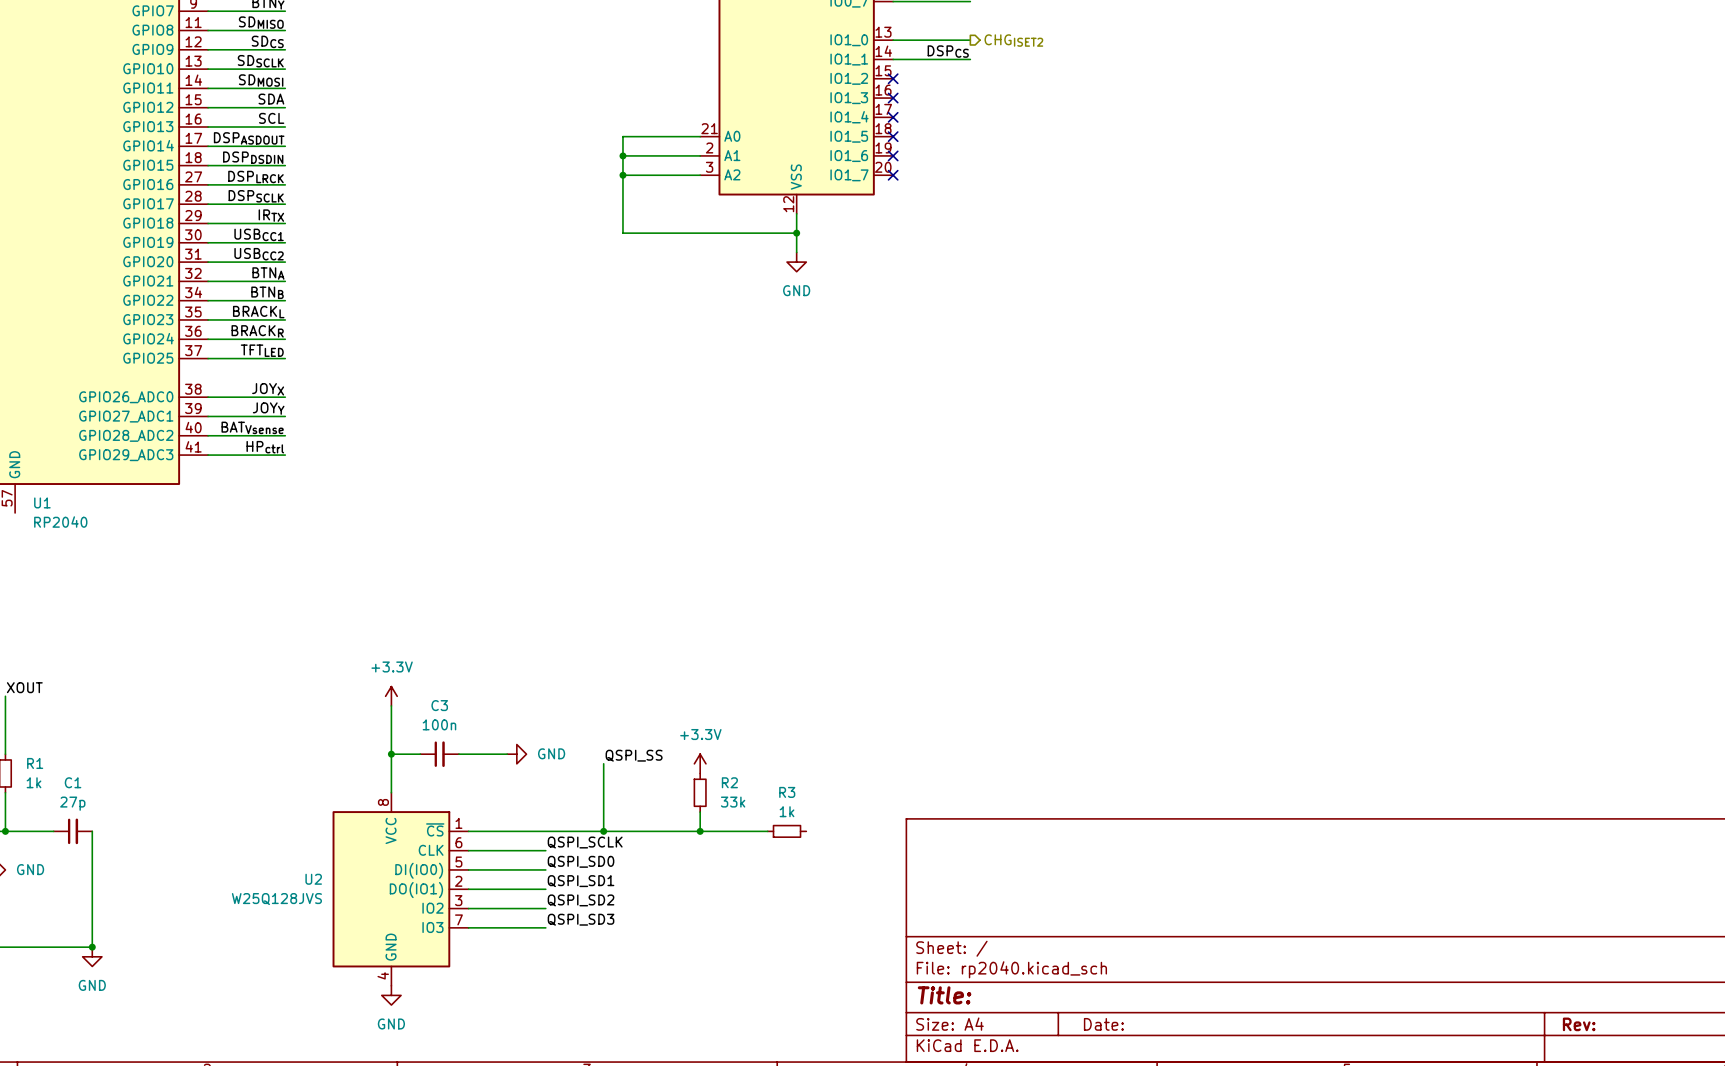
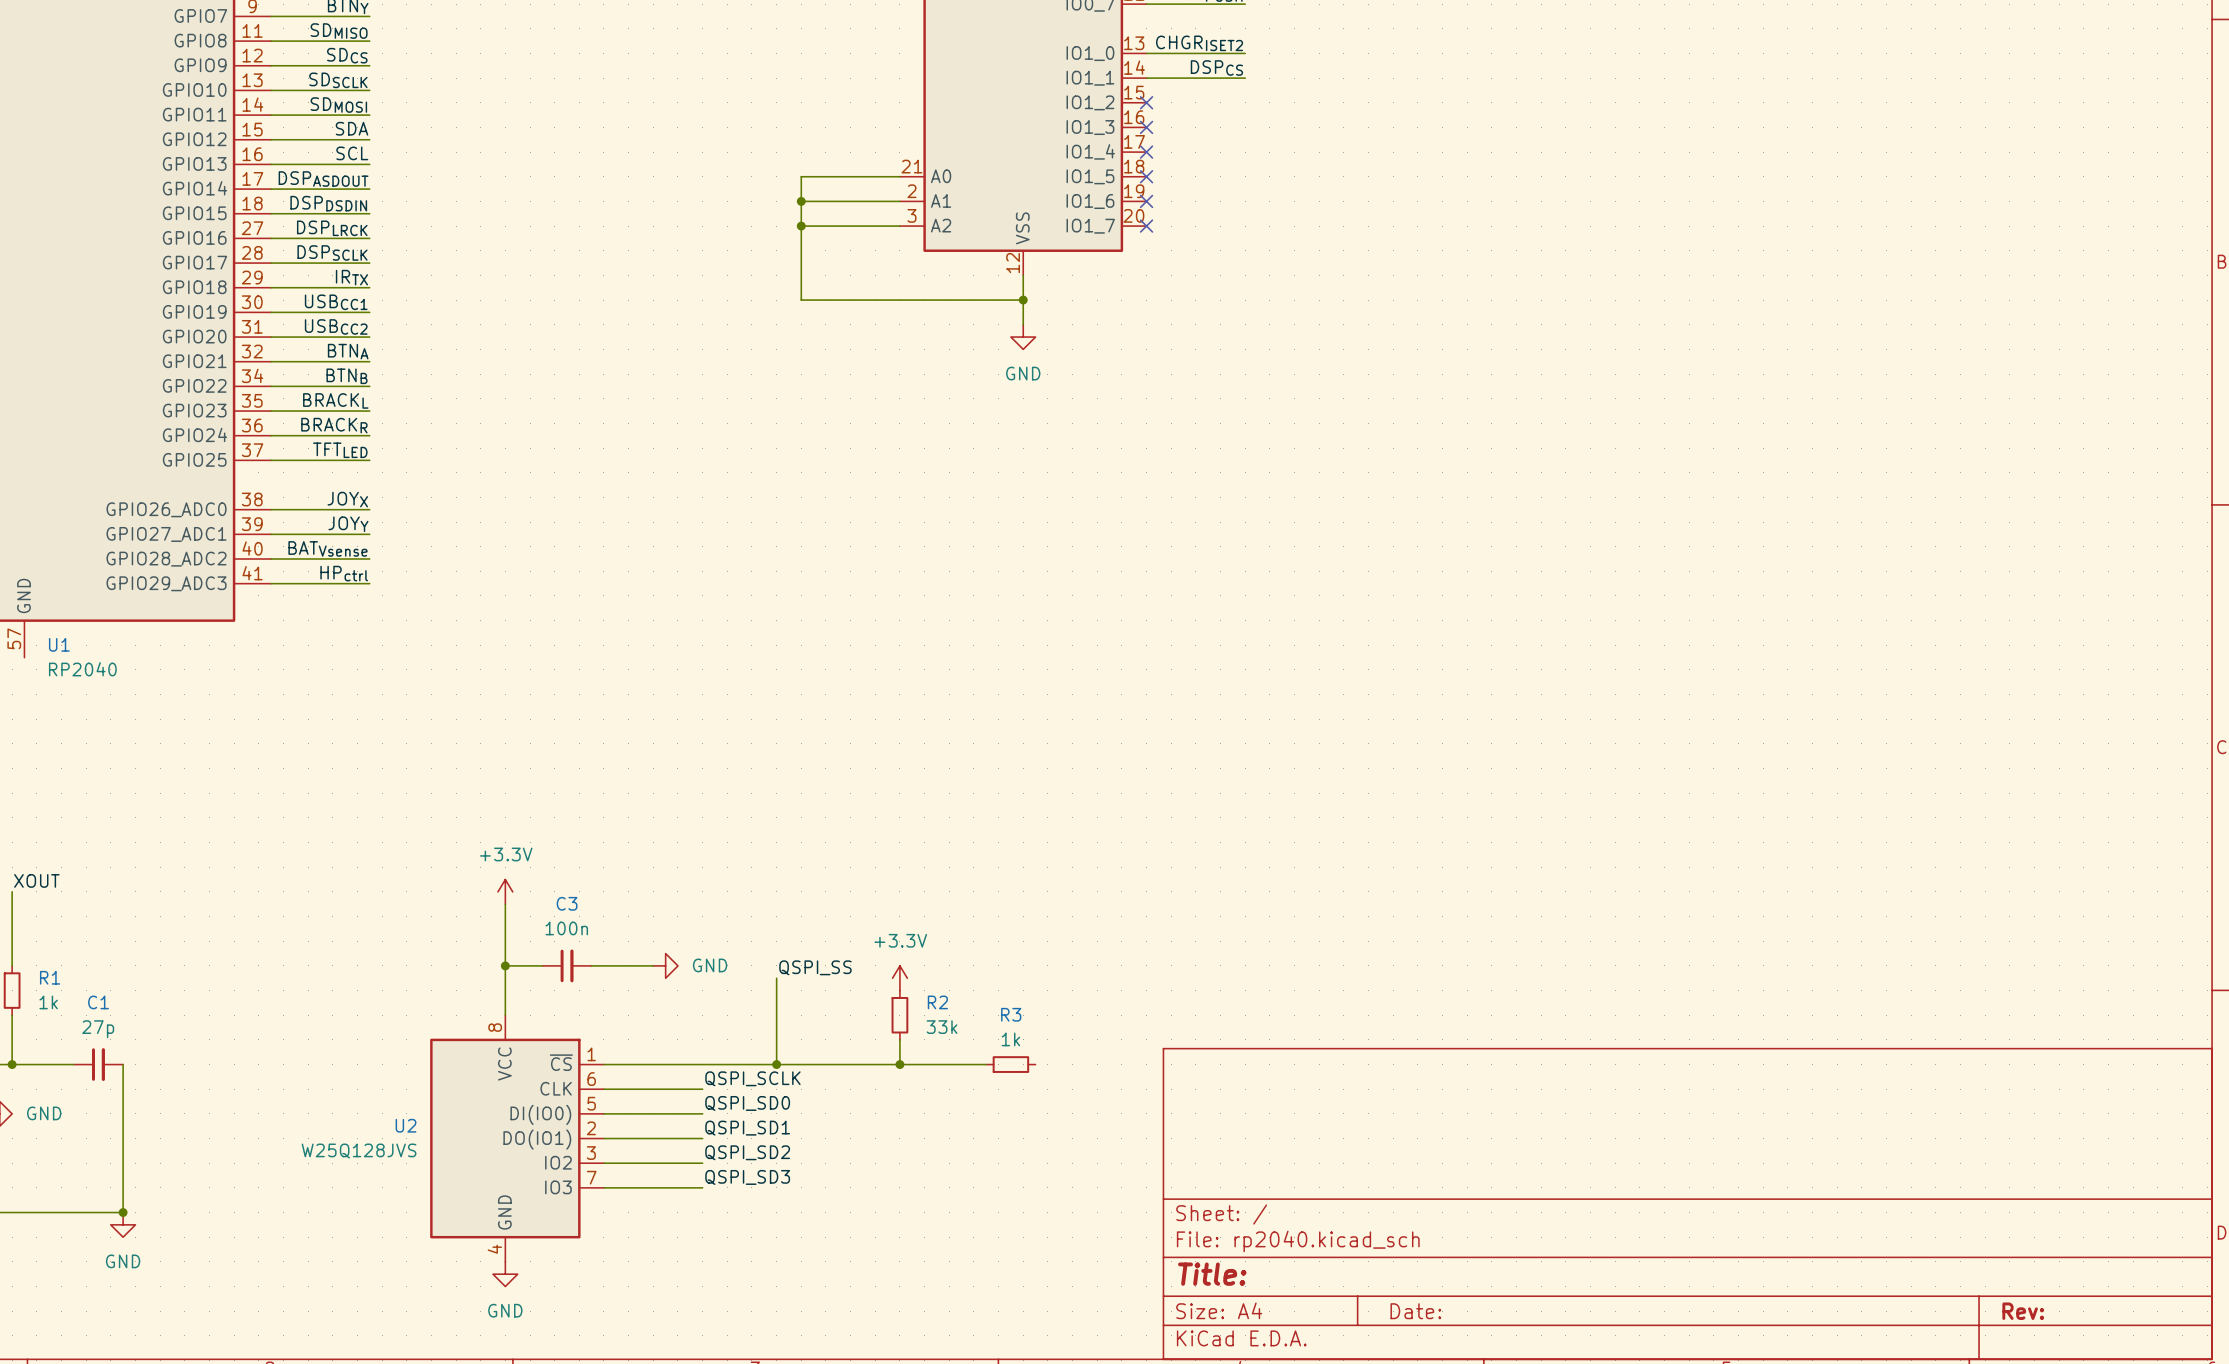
label: none -> CHGRISET2 (1199, 43)
hierarchical label: CHGISET2 (1013, 40) -> none

